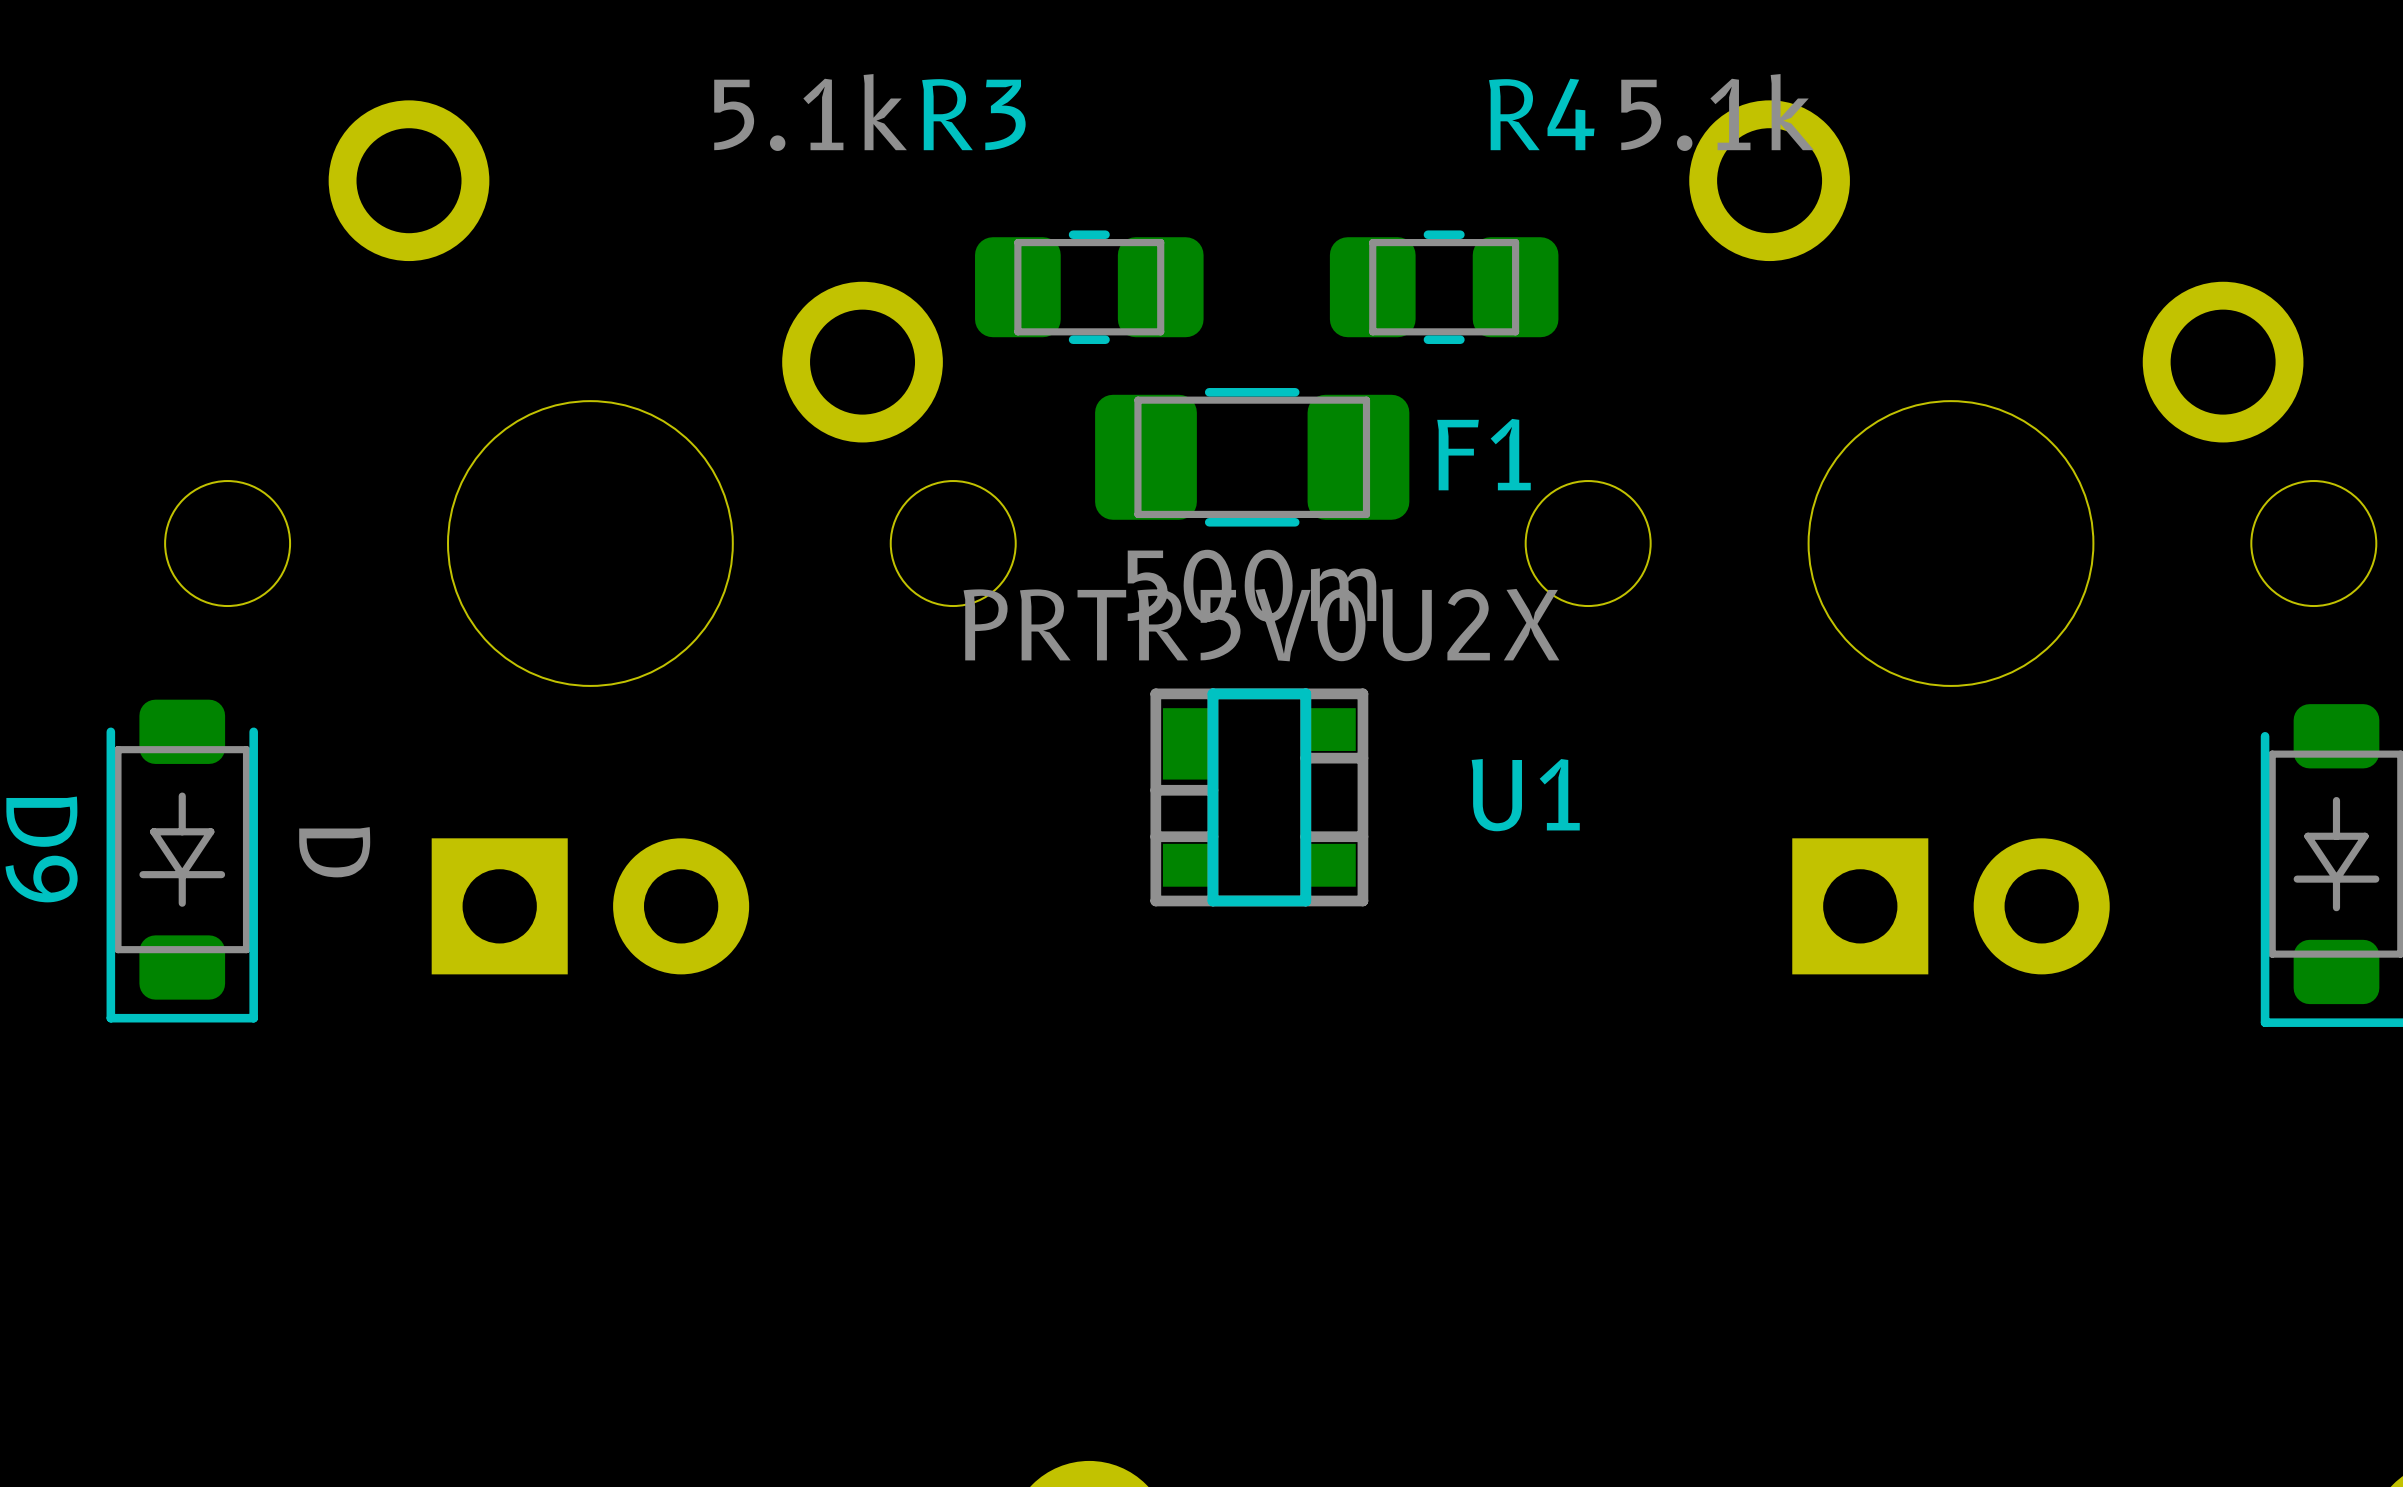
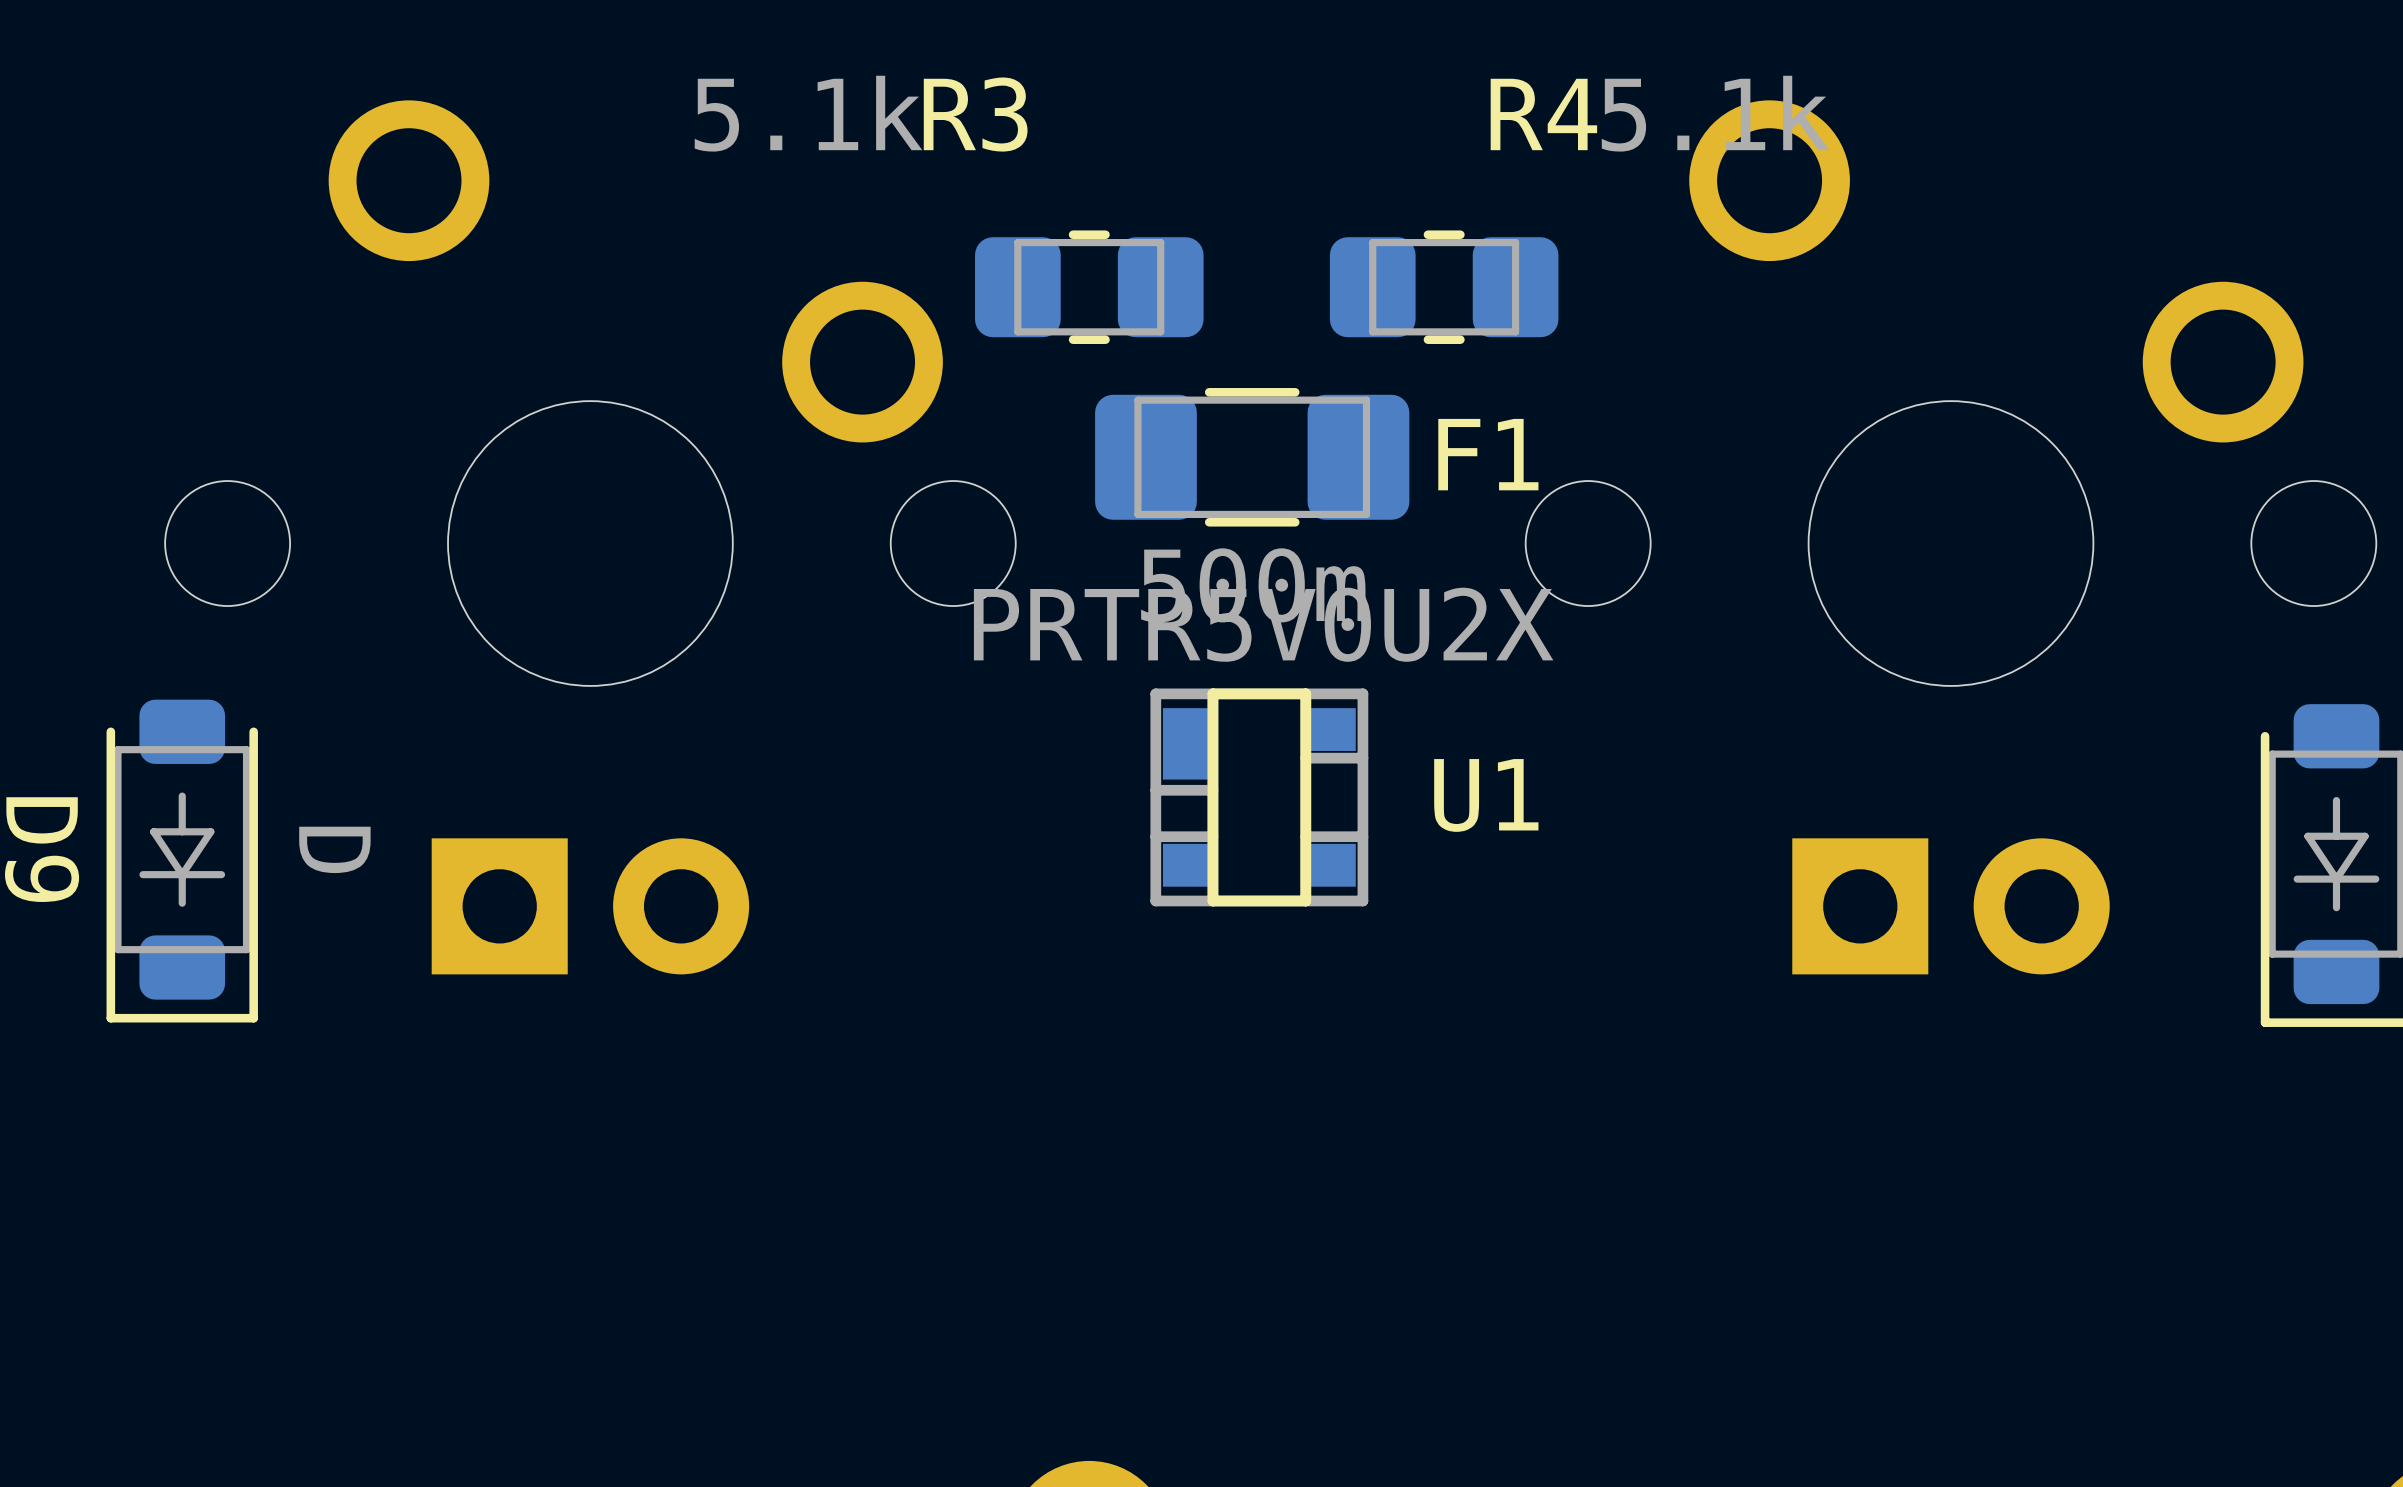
U1 name position: U1 (1525, 795) -> U1 (1486, 795)

